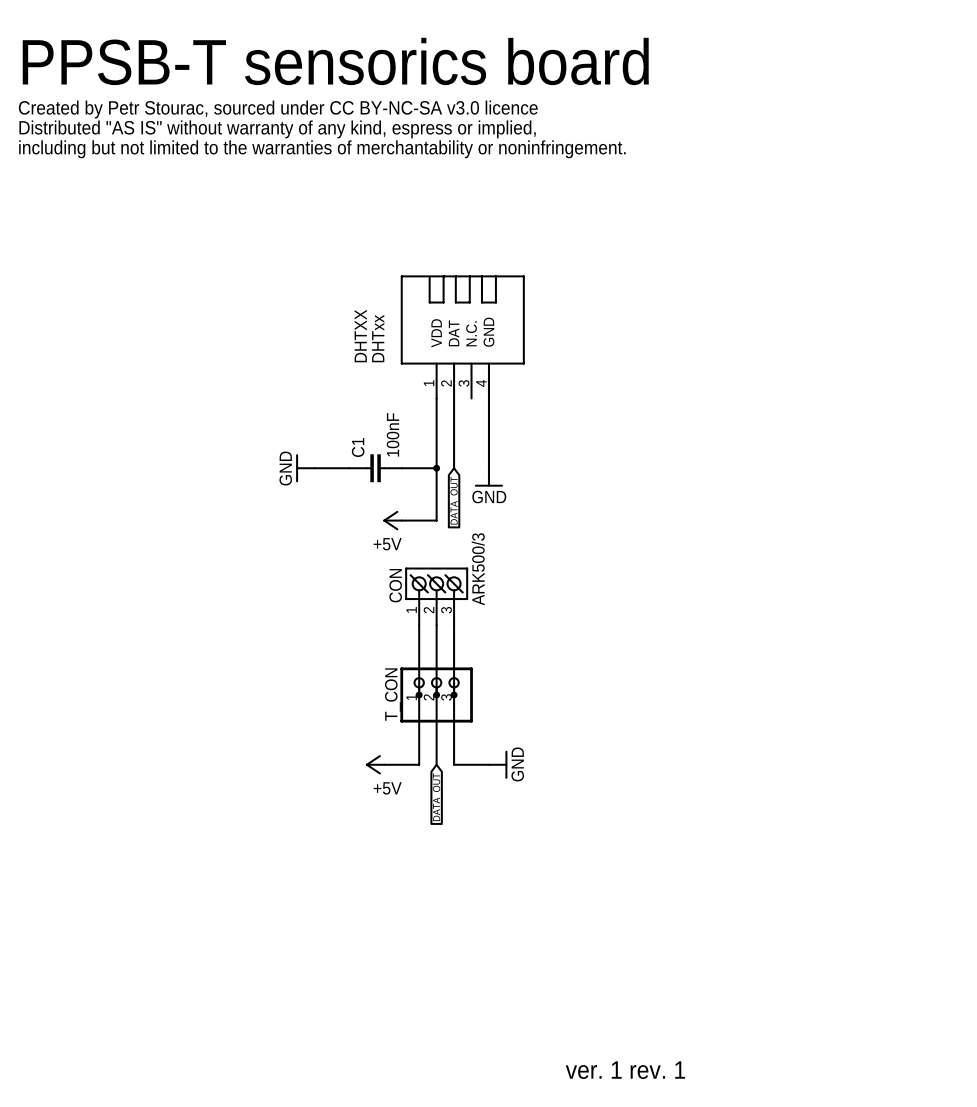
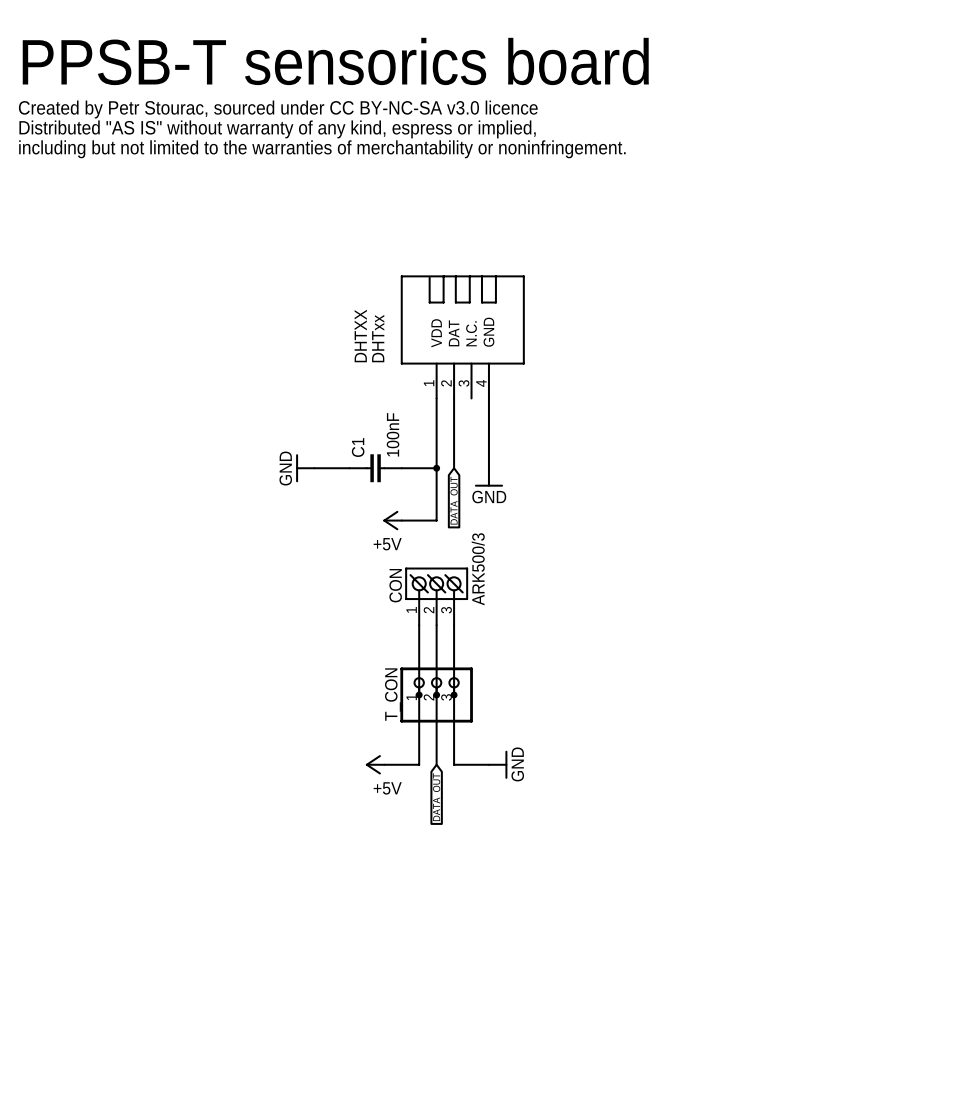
text: ver. 1 rev. 1 (625, 1070) -> none

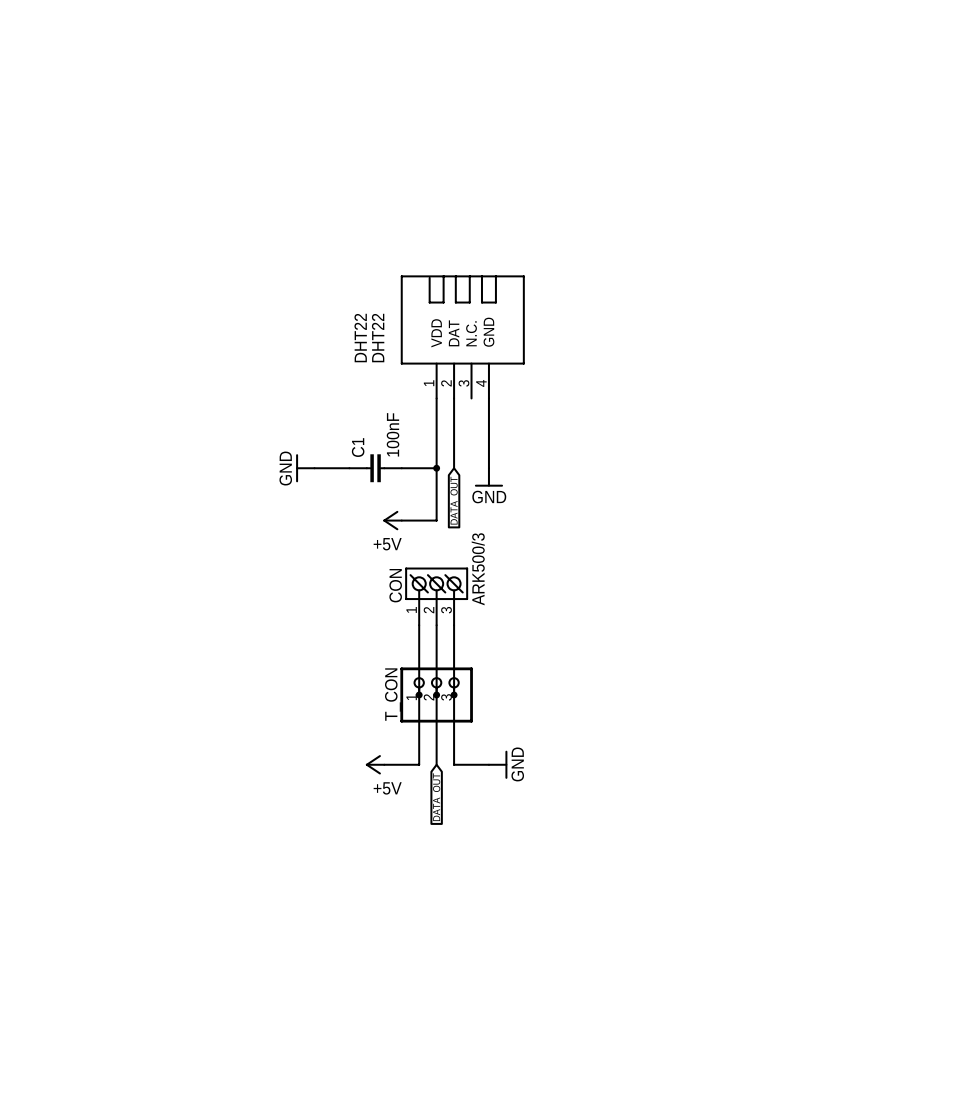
text: PPSB-T sensorics board (335, 61) -> none
text: Created by Petr Stourac, sourced under CC BY-NC-SA v3.0 licence (278, 109) -> none
text: Distributed "AS IS" without warranty of any kind, espress or implied, (277, 129) -> none
text: including but not limited to the warranties of merchantability or noninfringement. (322, 149) -> none
DHTXX name: DHTXX (360, 336) -> DHT22 (360, 338)
DHTXX value: DHTxx (378, 338) -> DHT22 (378, 338)

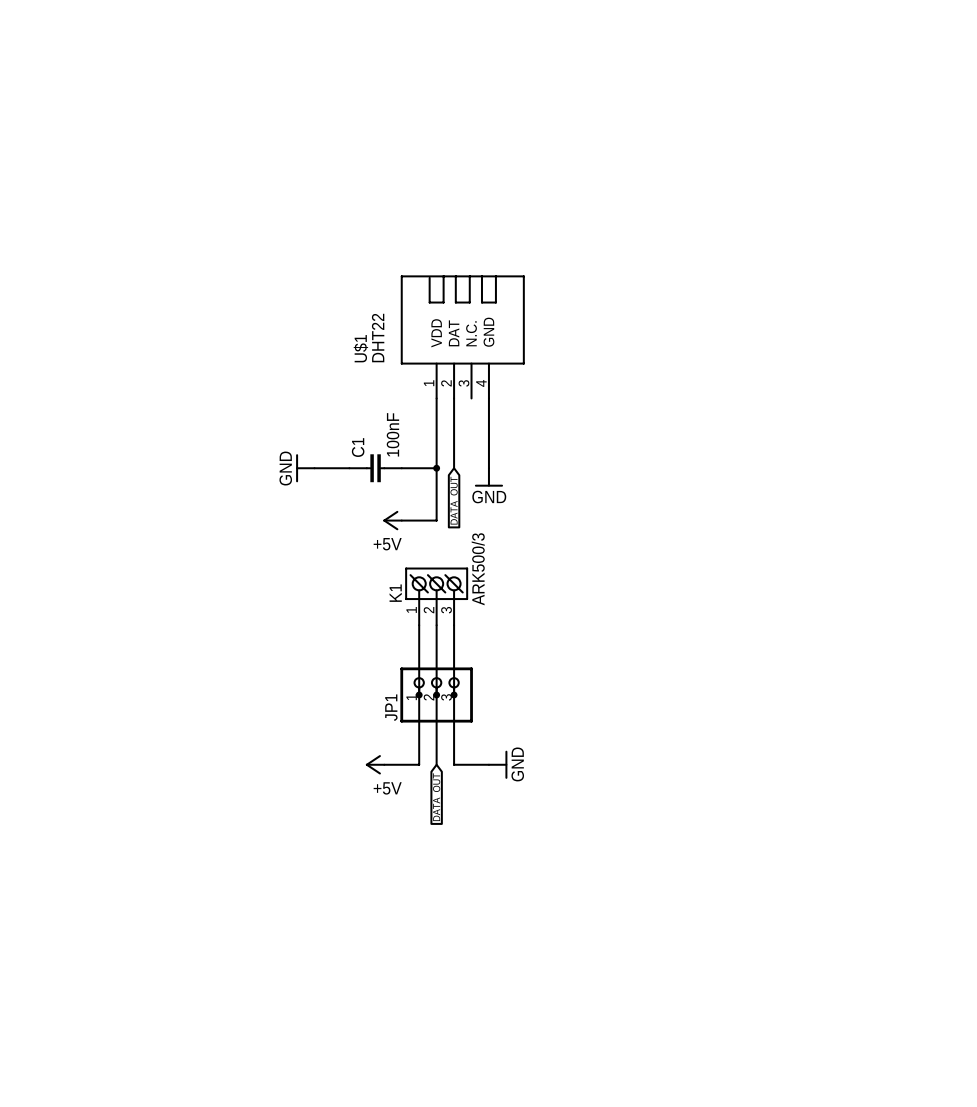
DHT22 name: DHT22 (360, 338) -> U$1 (360, 348)
CON name: CON (395, 585) -> K1 (395, 593)
T_CON name: T_CON (392, 694) -> JP1 (391, 707)

